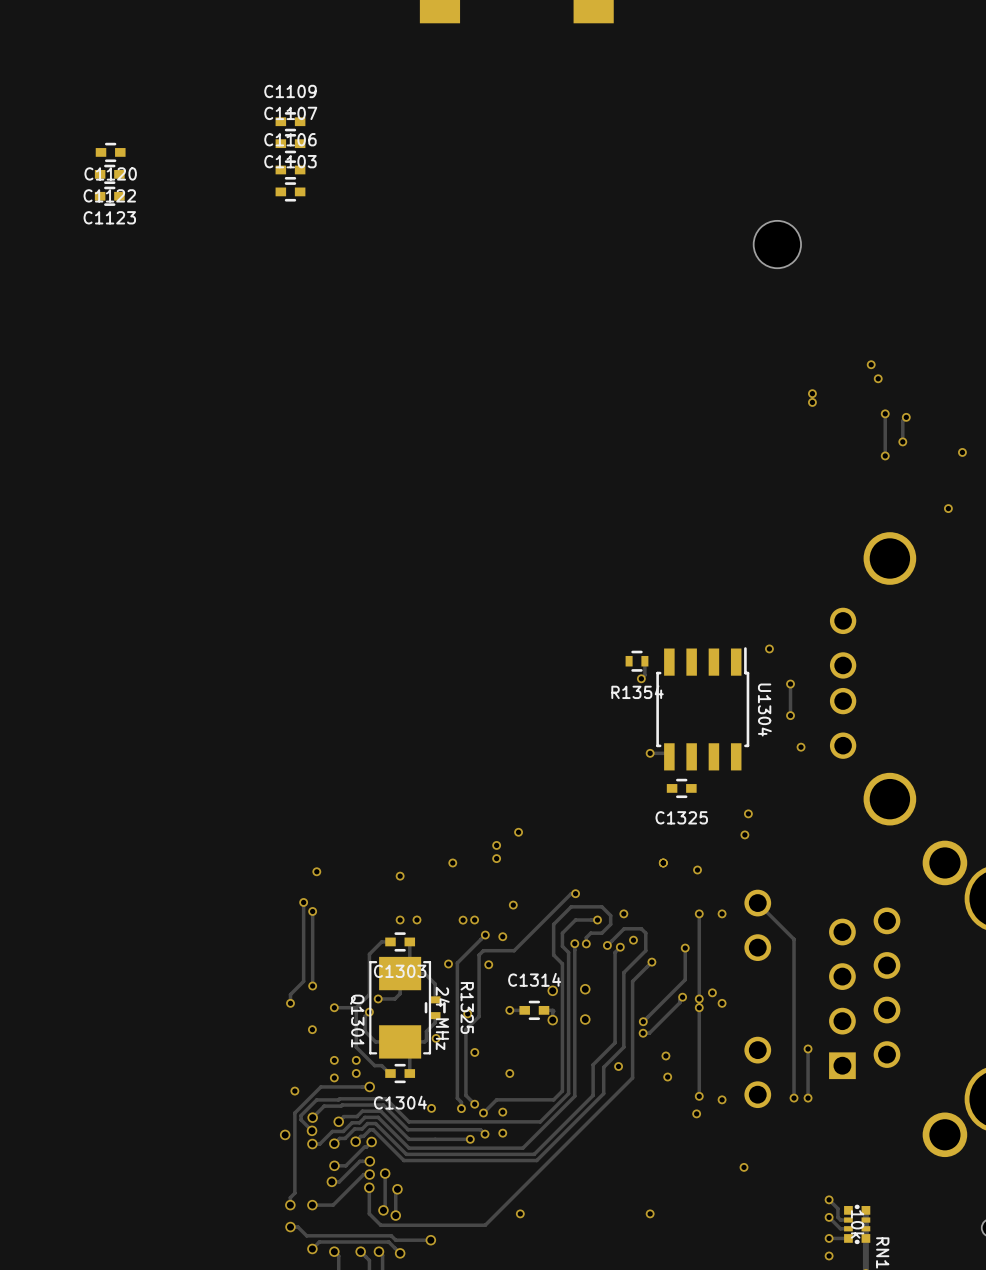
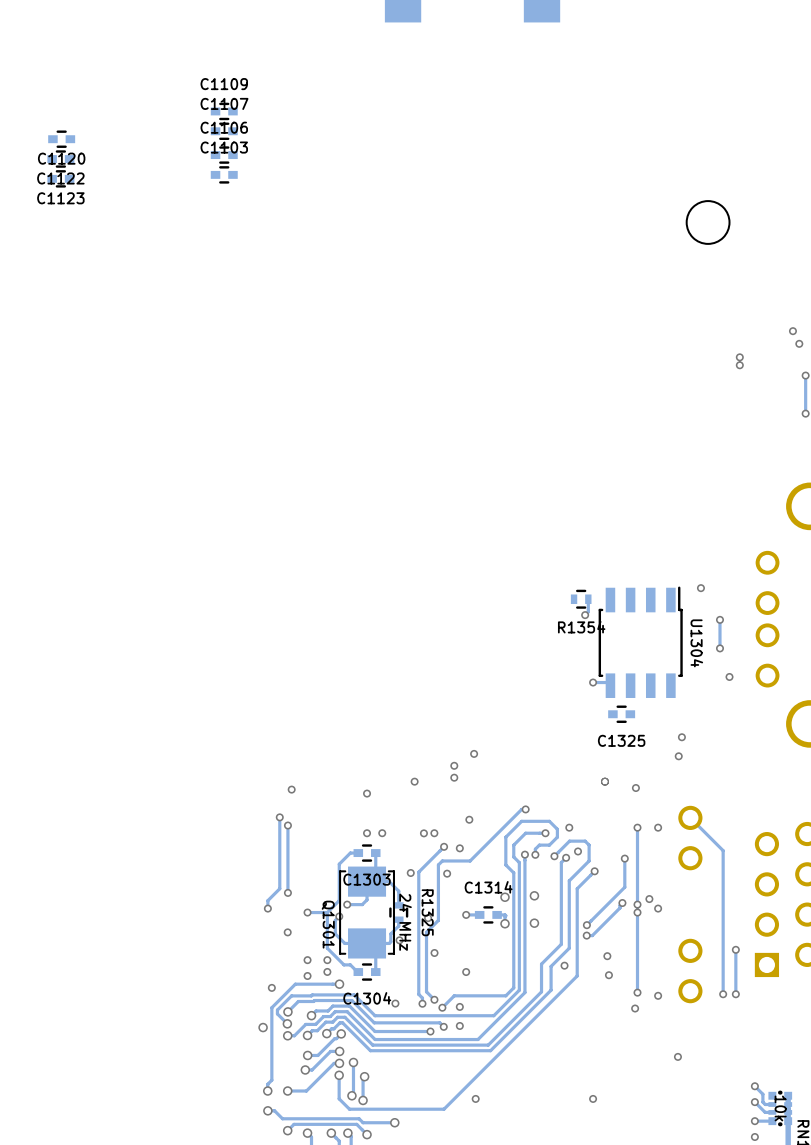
C1109 position: (290, 121) -> (224, 111)
C1107 position: (290, 143) -> (224, 131)
C1120 position: (110, 152) -> (61, 139)
C1106 position: (290, 169) -> (224, 155)
C1122 position: (109, 174) -> (60, 159)
C1103 position: (290, 191) -> (224, 174)
C1123 position: (109, 196) -> (60, 178)

